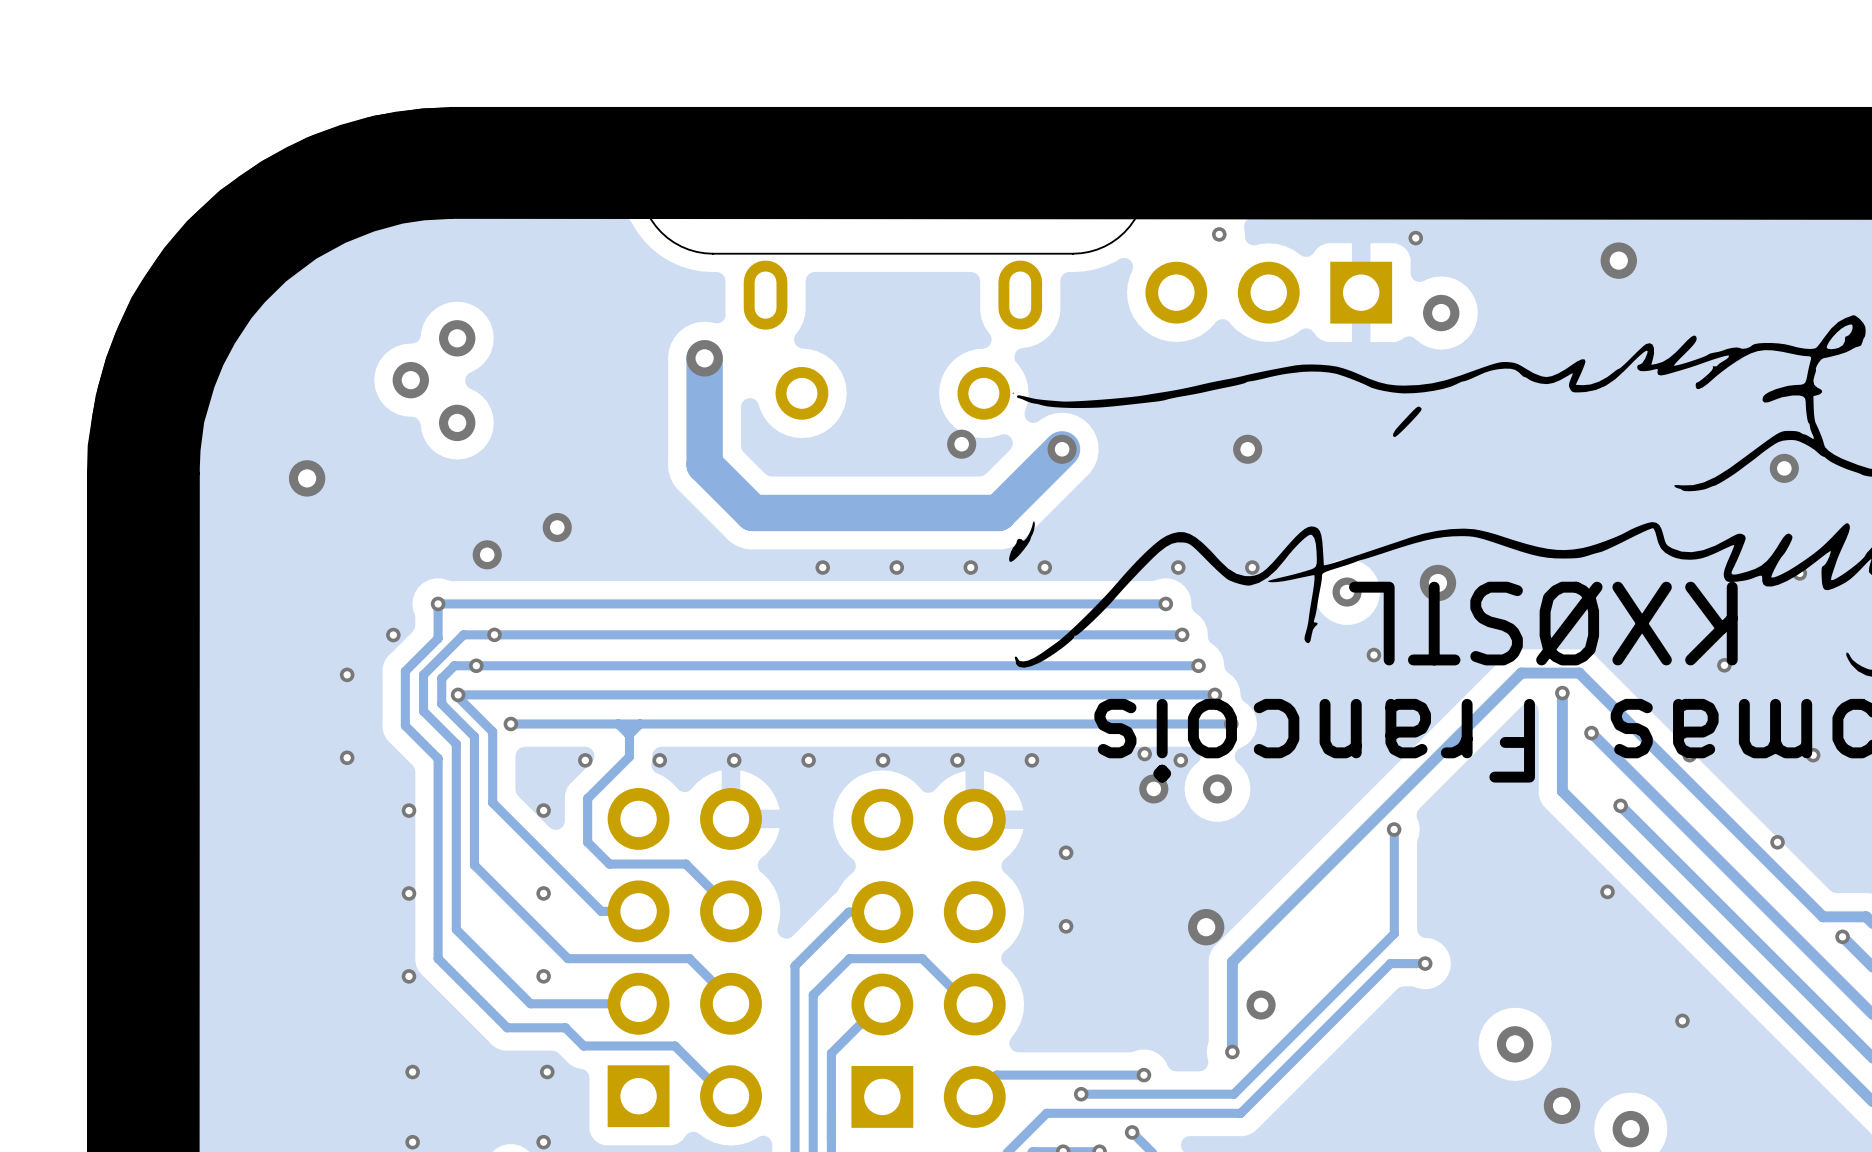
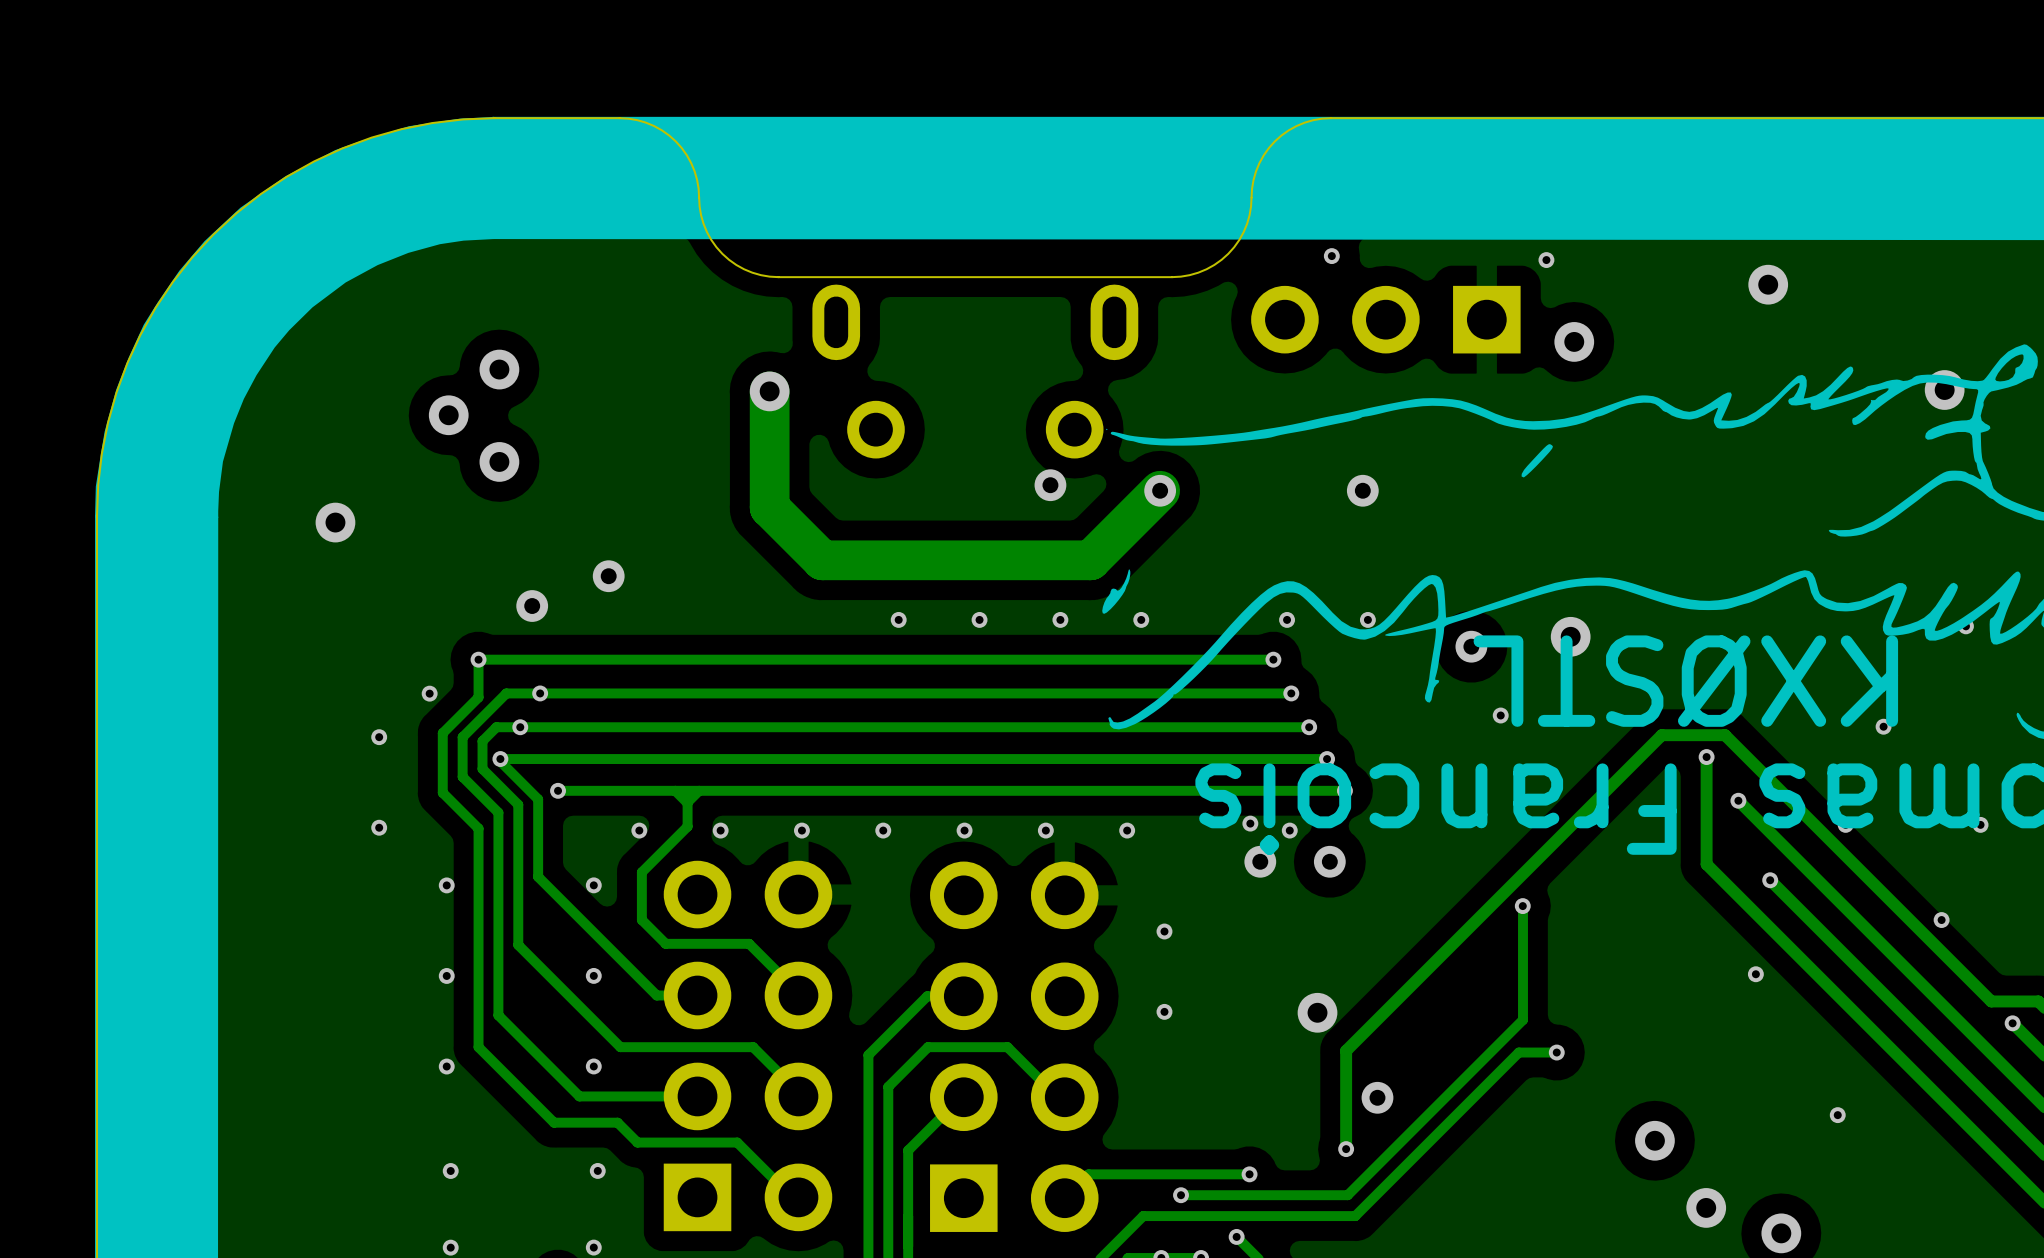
via: none -> (1944, 390)
via: (1784, 468) -> none

